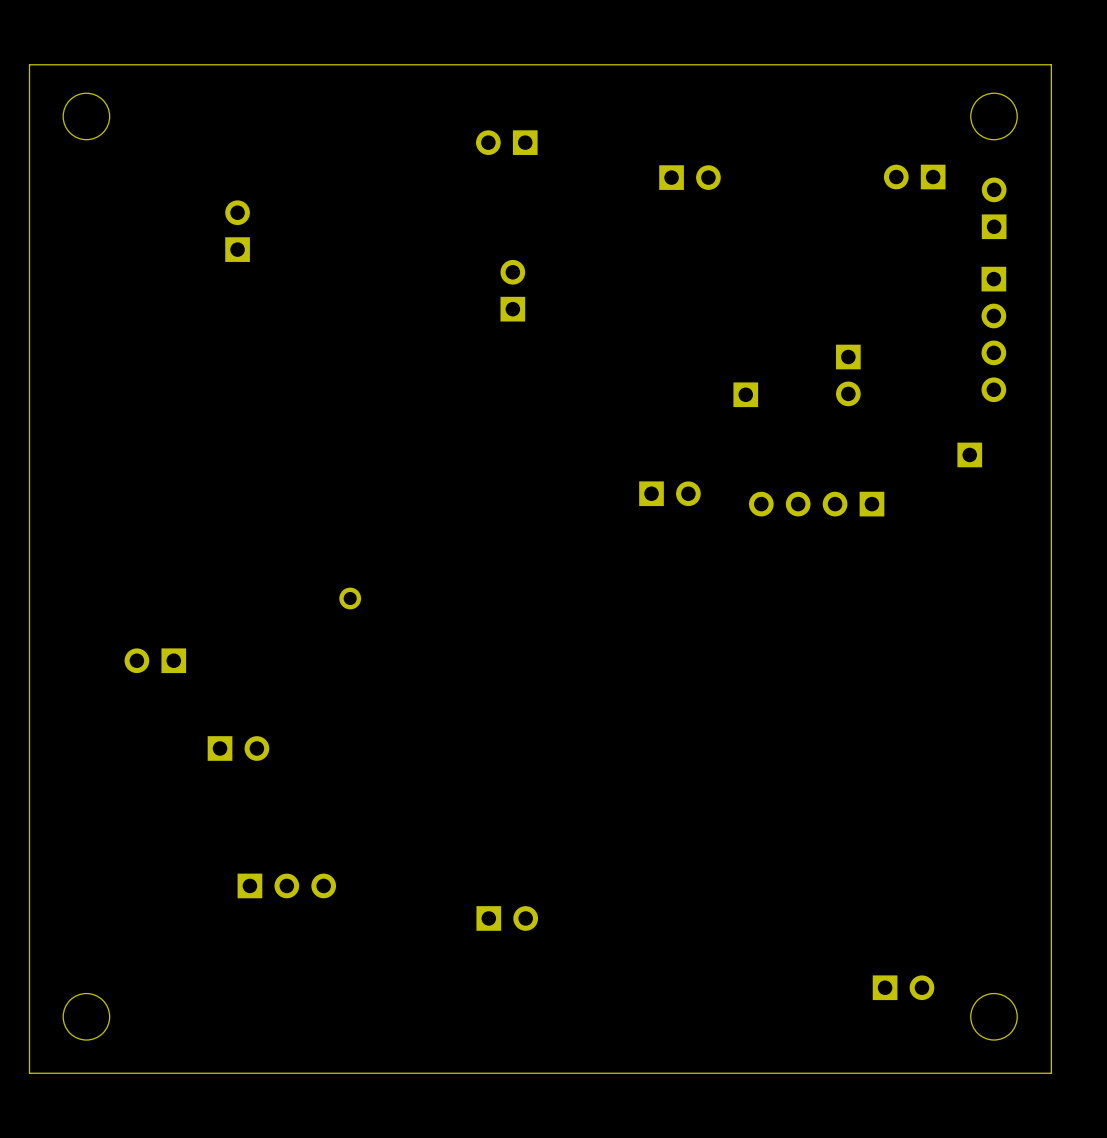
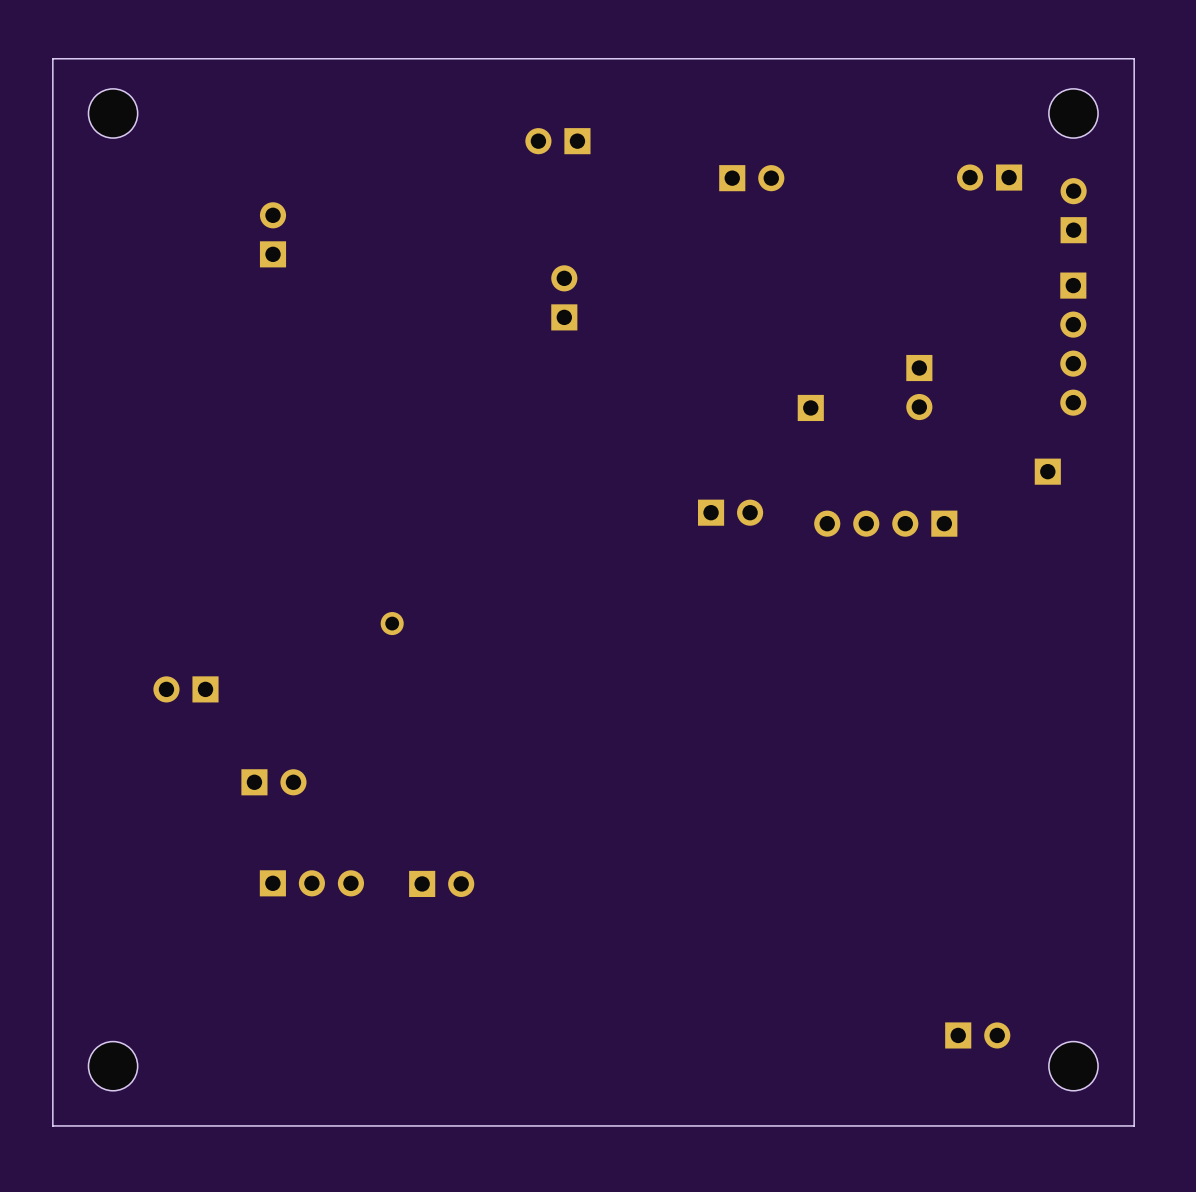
part position: (286, 885) -> (311, 883)
part position: (507, 918) -> (441, 883)

